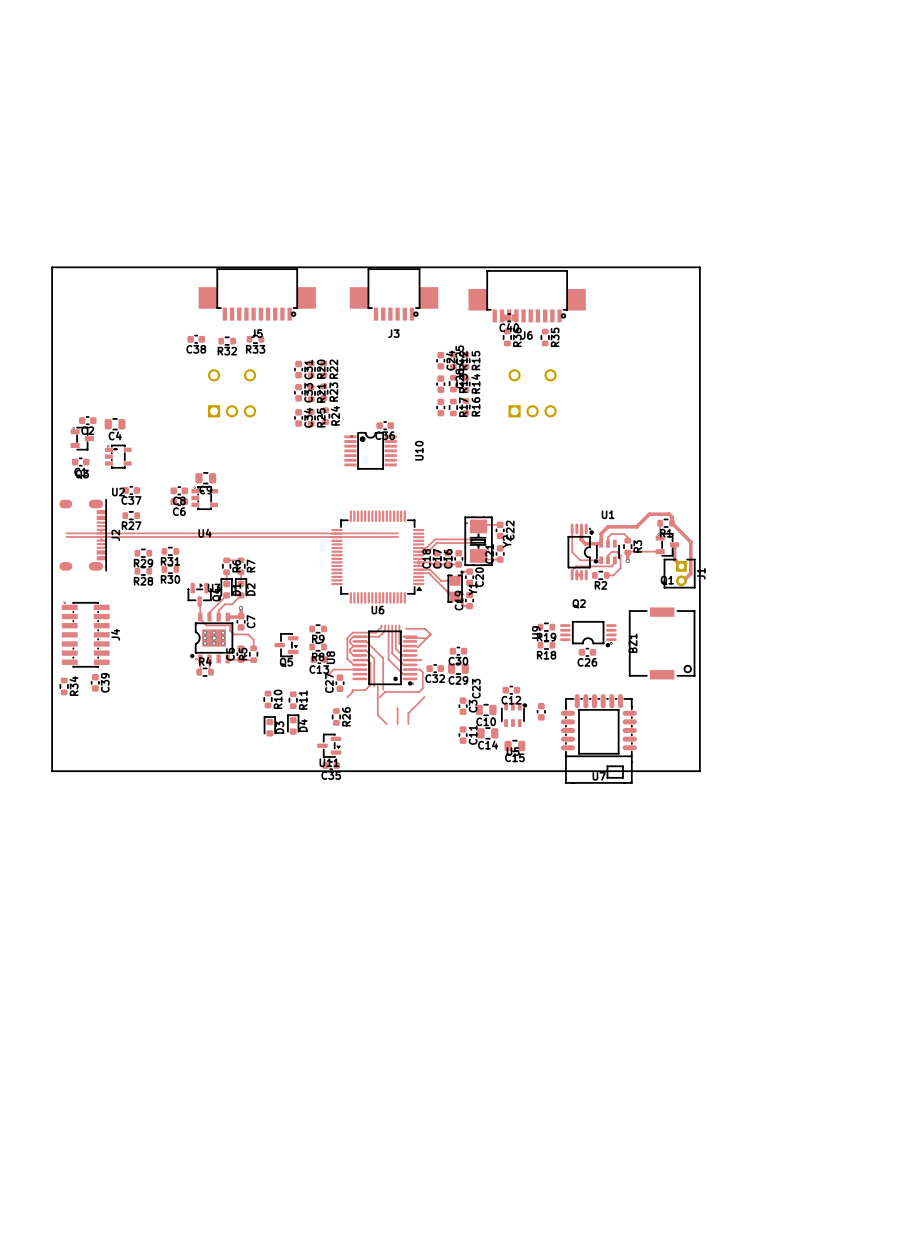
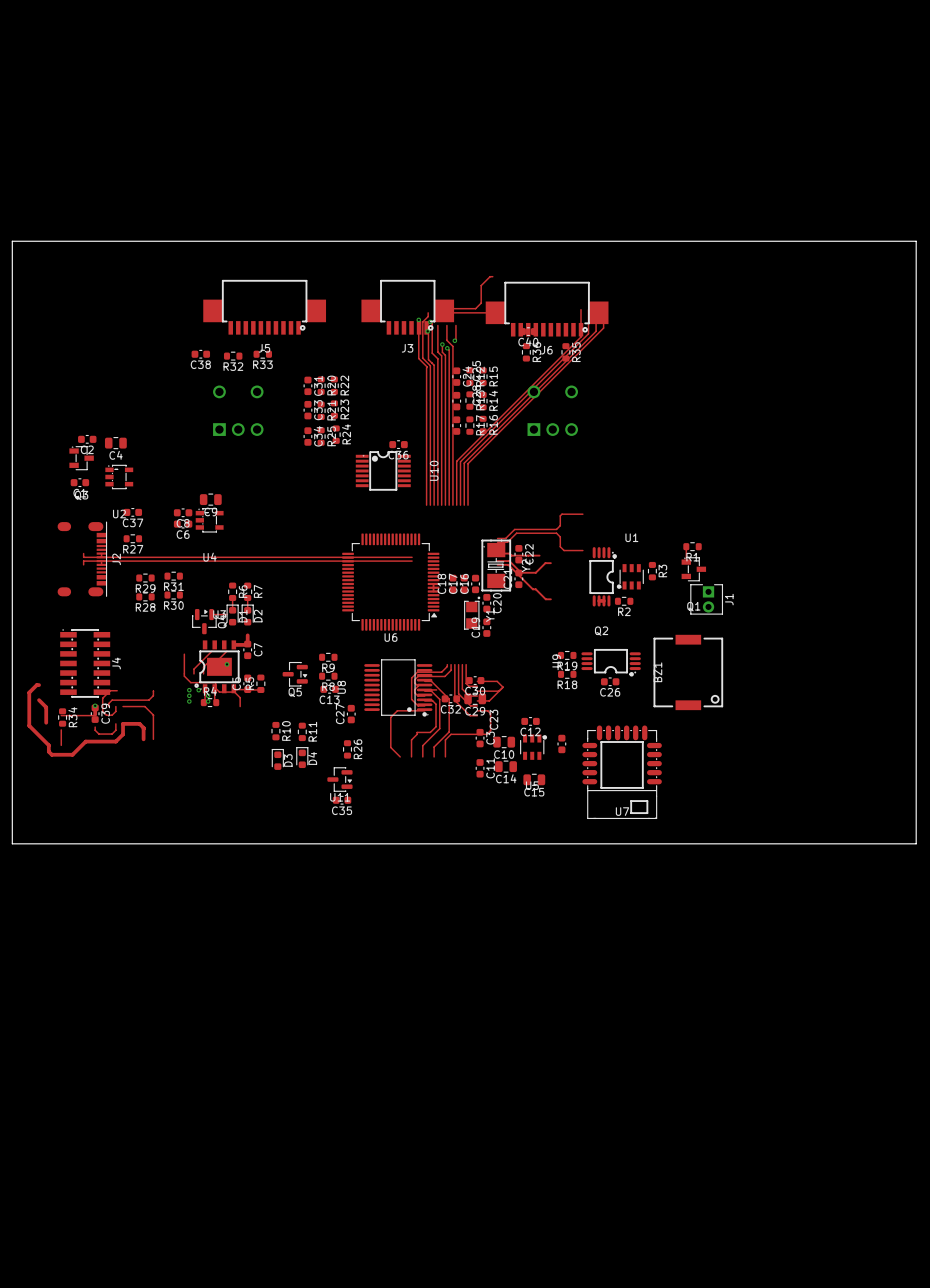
track: none -> (492, 276) (490, 276) (481, 285) (481, 303) (475, 308) (439, 308)
board edge: (52, 267) (699, 267) (699, 771) (52, 771) (52, 267) -> (12, 241) (12, 843) (916, 843) (916, 241) (12, 241)
track: none -> (581, 309) (581, 337) (456, 461) (456, 505)
track: none -> (588, 309) (588, 333) (460, 461) (460, 505)
track: none -> (596, 309) (596, 331) (464, 463) (464, 505)
track: none -> (603, 309) (603, 328) (468, 463) (468, 505)
track: none -> (428, 312) (428, 316) (422, 321) (422, 358) (430, 365) (430, 505)
track: none -> (492, 312) (441, 314)
track: none -> (418, 319) (418, 358) (427, 367) (426, 505)
via: none -> (418, 319)
track: none -> (430, 321) (432, 323) (432, 353) (437, 358) (437, 505)
via: none -> (430, 321)
track: none -> (437, 325) (437, 352) (441, 355) (441, 505)
track: none -> (446, 325) (446, 340) (452, 346) (452, 505)
track: none -> (455, 325) (454, 340)
track: none -> (427, 331) (428, 359) (434, 365) (434, 505)
via: none -> (427, 331)
via: none -> (454, 340)
track: none -> (442, 344) (442, 352) (445, 355) (445, 505)
via: none -> (442, 344)
track: none -> (447, 348) (449, 350) (449, 505)
via: none -> (447, 348)
track: (500, 524) (480, 524) (478, 535) (474, 539) (435, 539) (426, 548) (418, 548) -> (582, 514) (561, 514) (560, 525) (556, 529) (514, 529) (505, 538) (497, 538)
track: (572, 528) (571, 552) (580, 560) (601, 560) -> none
track: (581, 528) (580, 539) (585, 543) (601, 543) (601, 533) (607, 526) (636, 526) (649, 514) (669, 514) (672, 517) (672, 523) (690, 541) (690, 573) (681, 580) -> none
track: (66, 533) (84, 533) -> (83, 553) (83, 557)
track: (66, 536) (84, 536) -> (83, 564) (83, 561)
track: (627, 540) (624, 534) (611, 534) (607, 537) (607, 543) -> none
track: (674, 544) (674, 559) (681, 566) -> none
track: (418, 551) (428, 551) (436, 543) (474, 543) (478, 546) (478, 555) (482, 559) (500, 559) -> (497, 542) (507, 542) (516, 533) (556, 533) (560, 536) (560, 546) (564, 550) (582, 550)
track: (660, 551) (628, 551) (627, 561) -> none
track: (226, 560) (241, 560) -> (211, 614) (226, 614)
track: (607, 560) (607, 555) (611, 552) (616, 552) (620, 555) (620, 568) (613, 575) (606, 575) -> none
track: (614, 560) (611, 566) (576, 566) (572, 570) (571, 574) -> none
via: (627, 561) -> none
track: (418, 562) (458, 564) -> (497, 553) (539, 555)
track: (418, 569) (429, 569) (441, 580) (455, 580) (464, 571) (469, 571) -> (497, 561) (509, 561) (521, 572) (535, 572) (545, 563) (550, 563)
track: (418, 573) (429, 573) (452, 596) (455, 596) (464, 606) (469, 606) -> (497, 564) (508, 564) (532, 589) (535, 589) (545, 599) (550, 599)
track: (226, 595) (209, 612) (209, 617) -> (211, 651) (193, 669) (193, 673)
track: (241, 595) (232, 604) (224, 604) (218, 610) (218, 617) -> (226, 651) (217, 660) (210, 660) (203, 667) (203, 673)
track: (200, 598) (200, 619) (206, 625) (230, 625) (230, 630) (233, 634) (248, 634) (253, 639) (253, 648) -> (184, 654) (184, 676) (190, 682) (215, 682) (215, 688) (219, 692) (234, 692) (240, 697) (240, 706)
via: (241, 607) -> none
track: (381, 625) (375, 632) (352, 632) (347, 638) (347, 658) (353, 664) (359, 664) -> (447, 664) (441, 672) (417, 672) (411, 677) (411, 699) (418, 705) (424, 705)
track: (384, 625) (384, 630) (379, 636) (353, 636) (350, 639) (353, 646) (350, 652) (353, 655) (359, 655) -> (451, 664) (451, 670) (444, 676) (418, 676) (414, 679) (418, 686) (414, 692) (418, 696) (424, 696)
track: (388, 625) (388, 659) (403, 674) (410, 674) -> (454, 664) (454, 700) (470, 715) (477, 715)
track: (392, 625) (392, 653) (403, 664) (410, 664) -> (458, 664) (458, 693) (470, 705) (477, 705)
track: (395, 625) (395, 648) (402, 655) (410, 655) -> (462, 664) (462, 689) (469, 696) (477, 696)
track: (399, 625) (399, 643) (402, 646) (410, 646) -> (466, 664) (466, 683) (468, 686) (477, 686)
track: (406, 628) (425, 628) (430, 634) (417, 647) -> none
via: (205, 632) -> none
via: (214, 632) -> none
via: (223, 632) -> none
via: none -> (226, 664)
via: (205, 638) -> none
via: (214, 638) -> none
via: (223, 638) -> none
track: (406, 638) (426, 638) -> (477, 691) (499, 691)
track: (359, 641) (366, 641) (383, 658) (383, 689) -> none
via: (205, 643) -> none
via: (214, 643) -> none
via: (223, 643) -> none
track: (359, 650) (366, 650) (374, 658) (374, 686) -> (424, 691) (431, 691) (439, 699) (439, 728)
track: none -> (424, 681) (431, 681) (449, 699) (449, 731) (434, 747) (434, 756)
track: none -> (477, 681) (497, 681) (503, 687) (489, 700) (477, 700)
track: none -> (39, 685) (29, 692) (29, 725) (48, 745) (48, 751) (51, 754) (72, 754) (85, 741) (115, 741) (123, 734) (123, 723) (139, 723) (144, 728) (143, 739)
track: none -> (117, 690) (110, 690) (102, 698) (102, 711) (106, 715) (112, 715) (115, 711) (115, 706)
via: none -> (189, 690)
via: none -> (198, 690)
track: (359, 660) (367, 660) (370, 663) (370, 684) (365, 690) (352, 690) (347, 697) -> (424, 700) (432, 700) (436, 704) (436, 726) (430, 732) (417, 732) (411, 739)
track: none -> (153, 691) (153, 695) (148, 700) (112, 700) (108, 706)
via: none -> (189, 695)
via: none -> (208, 695)
track: none -> (39, 700) (46, 707) (46, 722)
track: (359, 669) (333, 669) (327, 675) -> (424, 710) (397, 710) (390, 717)
track: (410, 669) (420, 669) (422, 672) (422, 688) (419, 692) (384, 692) (379, 697) -> none
via: none -> (189, 701)
via: none -> (208, 701)
track: none -> (95, 705) (94, 715) (61, 715)
via: none -> (95, 705)
track: none -> (123, 706) (144, 706) (153, 715) (153, 739)
track: none -> (477, 710) (487, 710) (490, 713) (490, 730) (486, 734) (451, 734) (445, 739) (445, 756)
track: none -> (115, 723) (115, 730) (112, 734) (98, 734) (95, 730) (95, 727)
track: none -> (61, 729) (61, 745)

